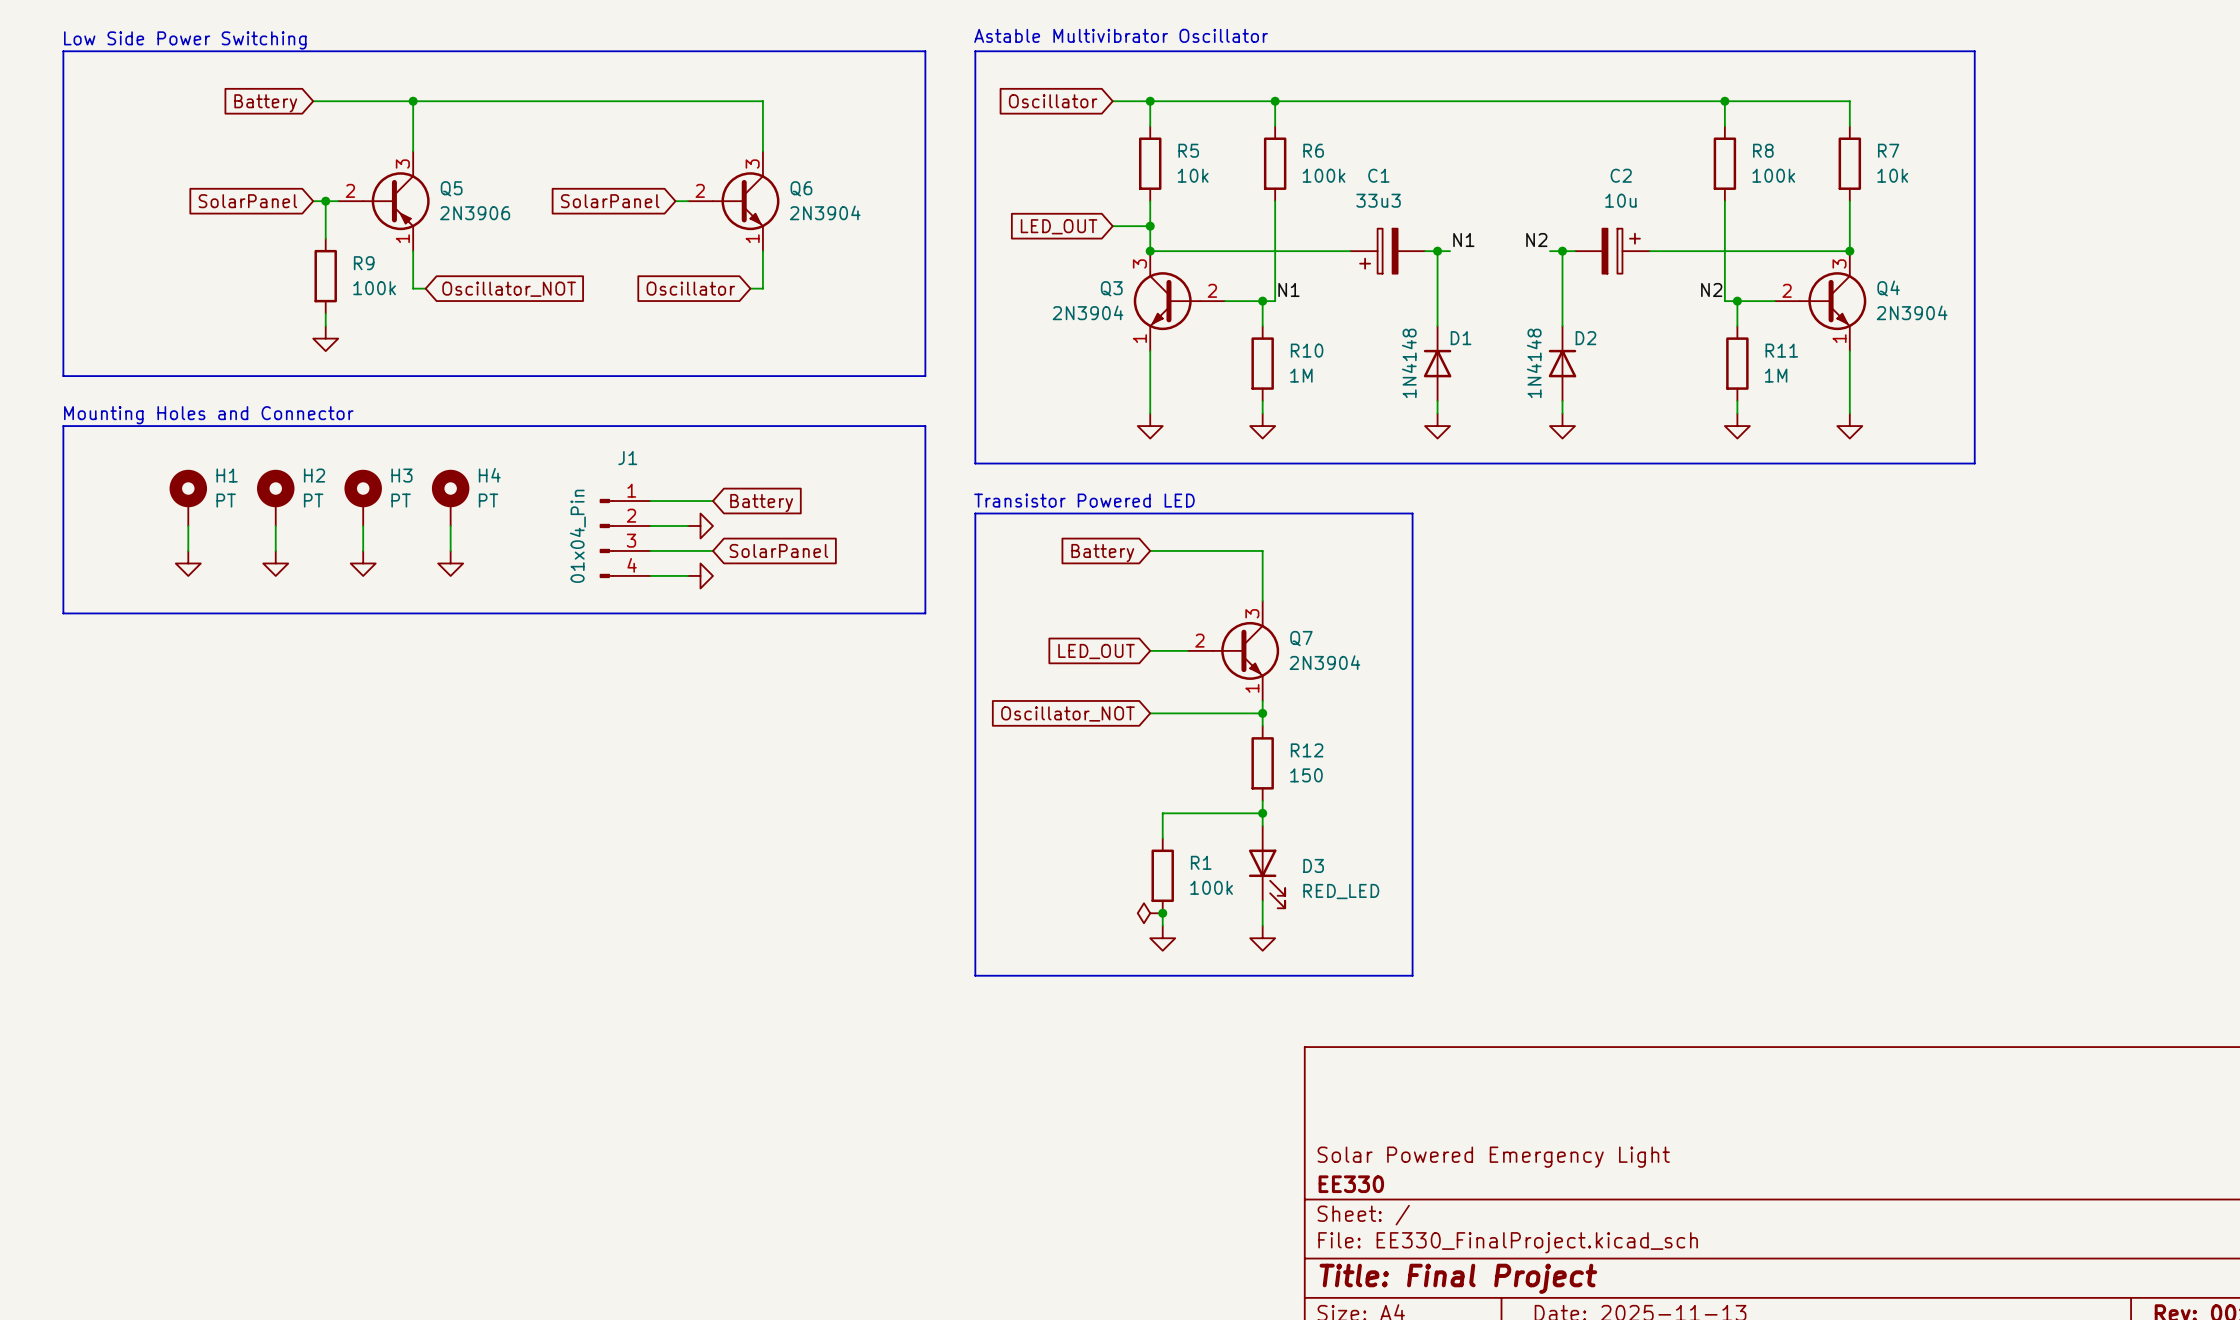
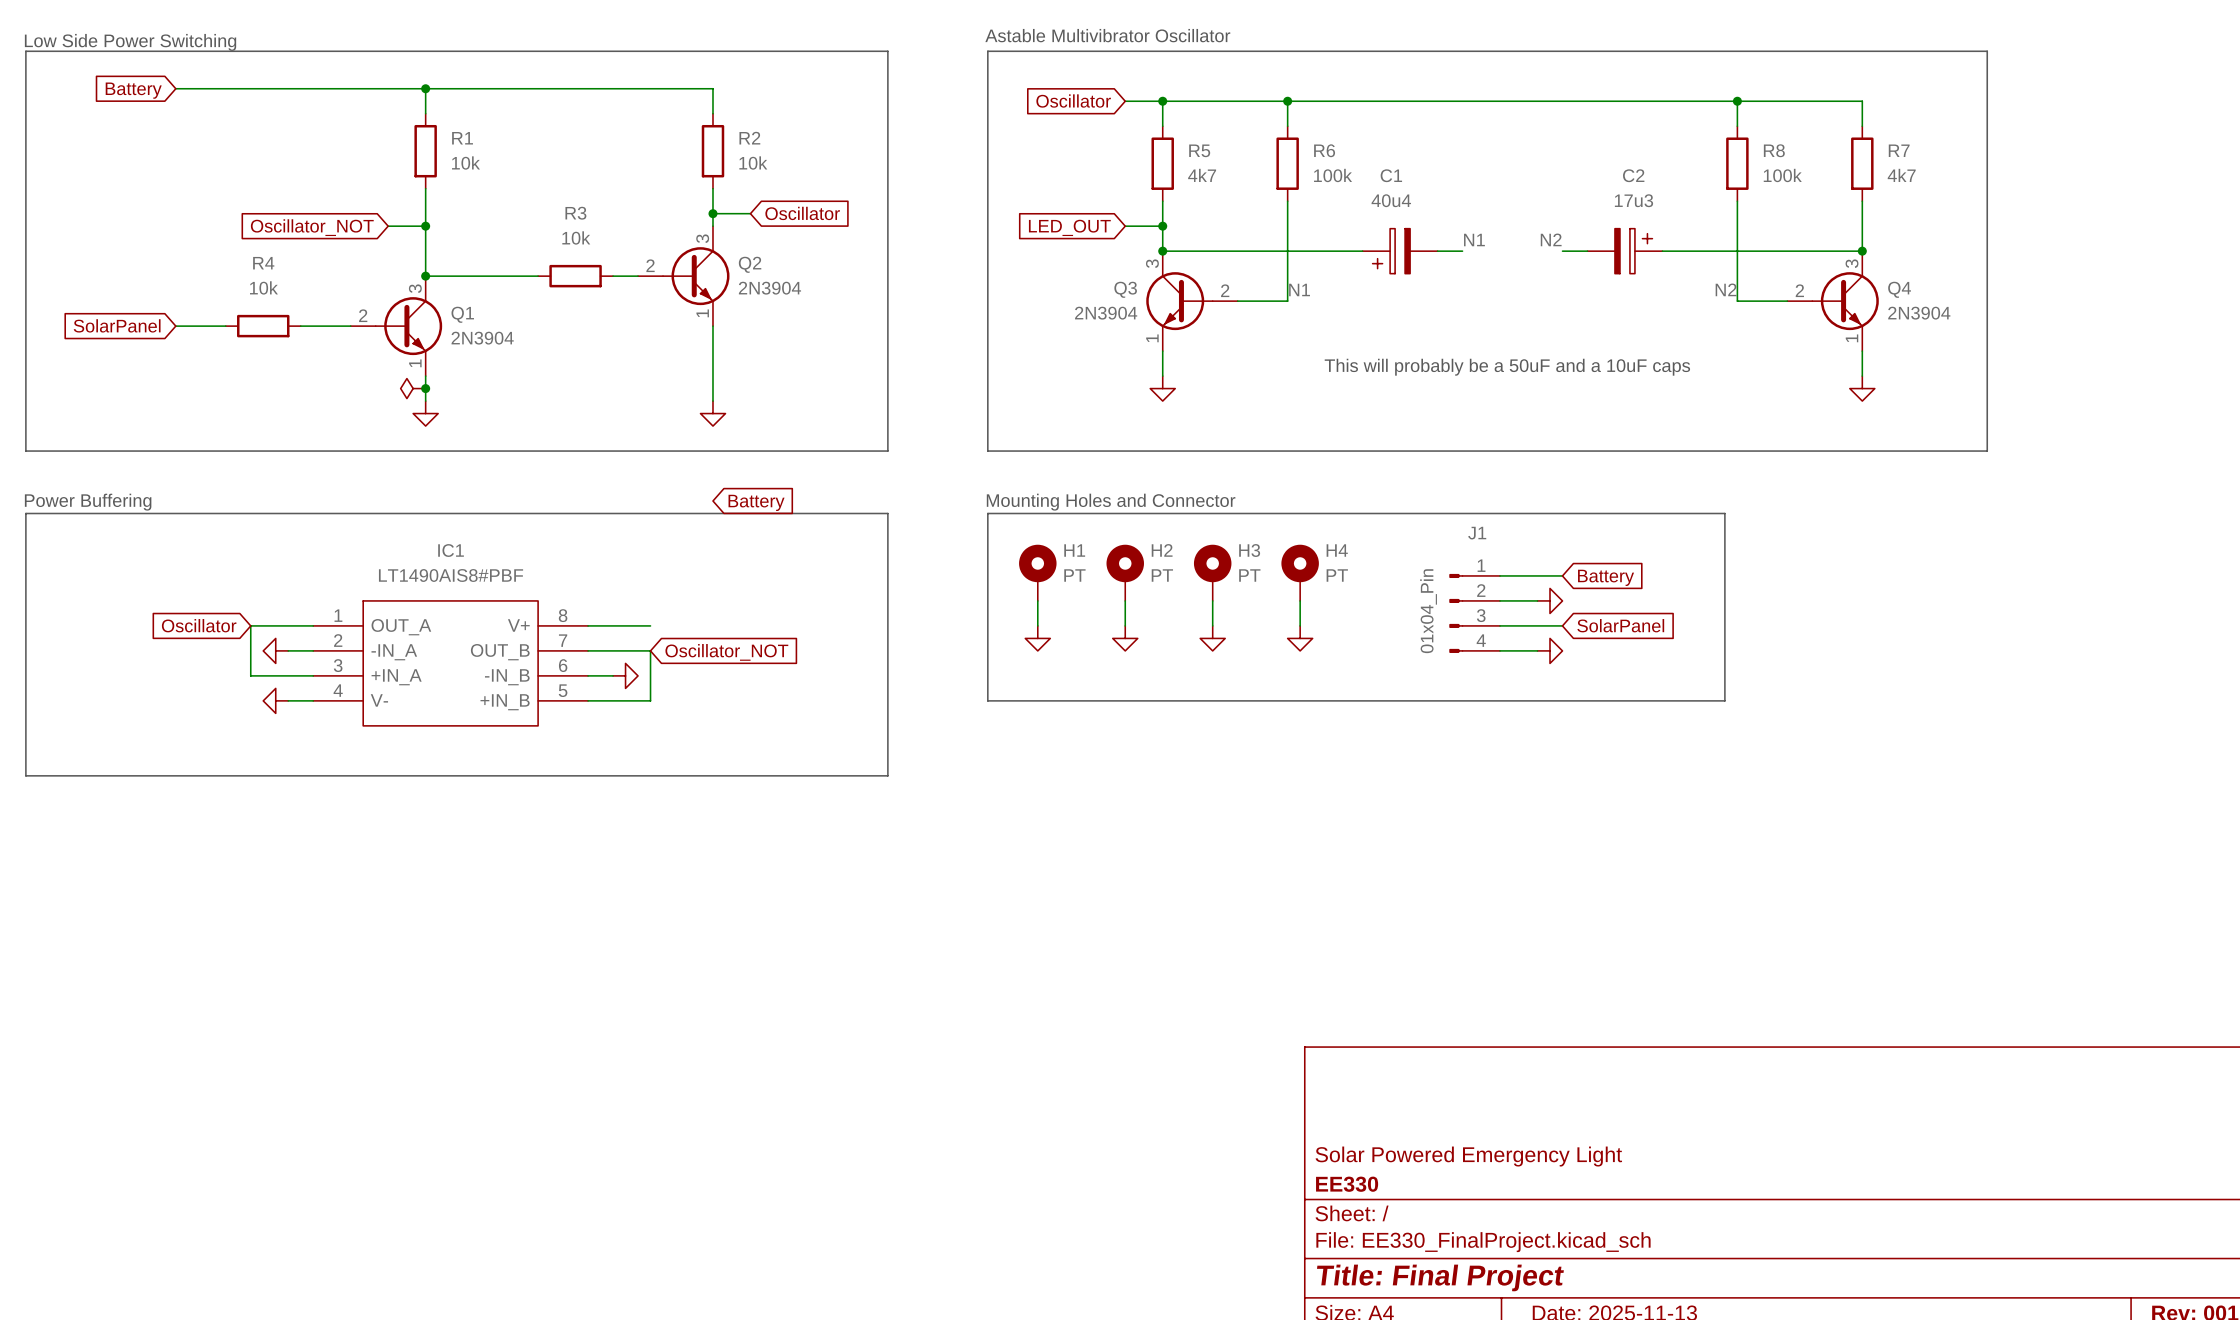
text position: Astable Multivibrator Oscillator (1121, 35) -> Astable Multivibrator Oscillator (1107, 35)
text position: Low Side Power Switching (185, 40) -> Low Side Power Switching (130, 42)
line: (63, 51) (63, 376) (925, 376) (925, 51) (887, 51) -> (63, 51) (25, 51) (25, 451) (887, 451) (887, 51)
line: (987, 51) (975, 51) (975, 463) (1974, 463) (1974, 51) -> (987, 51) (987, 451) (1987, 451) (1987, 51) (1974, 51)
wire: none -> (175, 88) (712, 88) (712, 113)
wire: none -> (425, 88) (425, 113)
wire: (313, 101) (762, 101) (762, 151) -> none
wire: (413, 101) (413, 151) -> none
junction position: (413, 101) -> (425, 88)
global label position: Oscillator (1053, 101) -> Oscillator (1073, 101)
wire: (1112, 101) (1125, 101) -> none
wire: (1150, 101) (1150, 126) -> (1162, 101) (1162, 126)
junction position: (1150, 101) -> (1162, 101)
wire: (1275, 101) (1275, 126) -> (1287, 101) (1287, 126)
junction position: (1275, 101) -> (1287, 101)
wire: (1724, 101) (1724, 126) -> (1737, 101) (1737, 126)
junction position: (1724, 101) -> (1737, 101)
wire: (1849, 101) (1849, 126) -> (1849, 101) (1862, 101) (1862, 126)
global label position: Battery (265, 103) -> Battery (133, 90)
R2: none -> 10k (712, 151)
R5 position: (1150, 163) -> (1162, 163)
R6 position: (1275, 163) -> (1287, 163)
R8 position: (1724, 163) -> (1737, 163)
R7 position: (1849, 163) -> (1862, 163)
R5 value: 10k (1193, 175) -> 4k7 (1202, 175)
R7 value: 10k (1892, 175) -> 4k7 (1901, 175)
wire: none -> (425, 188) (425, 276) (538, 276)
wire: none -> (712, 188) (712, 226)
C1 value: 33u3 (1378, 200) -> 40u4 (1391, 200)
C2 value: 10u (1620, 200) -> 17u3 (1633, 200)
global label position: SolarPanel (247, 201) -> SolarPanel (117, 325)
wire: (313, 201) (338, 201) -> none
wire: (325, 201) (325, 238) -> none
junction: (325, 201) -> none
Q5: 2N3906 (383, 201) -> none
global label: SolarPanel (610, 201) -> none
wire: (675, 201) (688, 201) -> none
Q6: 2N3904 (733, 201) -> none
wire: (1150, 201) (1150, 251) (1162, 251) -> (1162, 201) (1162, 251)
wire: (1275, 201) (1275, 301) -> (1287, 201) (1287, 301) (1275, 301)
wire: (1724, 201) (1724, 301) (1737, 301) (1737, 326) -> none
wire: none -> (1737, 201) (1737, 301)
wire: (1849, 201) (1849, 251) -> (1862, 201) (1862, 251) (1849, 251)
wire: none -> (712, 213) (750, 213)
junction: none -> (712, 213)
wire: none -> (388, 226) (425, 226)
junction: none -> (425, 226)
global label position: LED_OUT (1059, 226) -> LED_OUT (1069, 227)
wire: (1112, 226) (1125, 226) -> (1150, 226) (1162, 226)
junction position: (1150, 226) -> (1162, 226)
label position: N1 (1463, 240) -> N1 (1474, 240)
label position: N2 (1536, 240) -> N2 (1551, 239)
wire: (413, 251) (413, 288) (425, 288) -> none
wire: (762, 251) (762, 288) (750, 288) -> none
junction position: (1150, 251) -> (1162, 251)
C1 position: (1387, 251) -> (1400, 251)
wire: (1425, 251) (1437, 251) (1437, 326) -> none
junction: (1437, 251) -> none
wire: none -> (1450, 251) (1462, 251)
wire: (1550, 251) (1562, 251) (1562, 326) -> none
junction: (1562, 251) -> none
C2 position: (1612, 251) -> (1624, 251)
junction position: (1849, 251) -> (1862, 251)
R9: 100k (325, 276) -> none
junction: none -> (425, 276)
R3: none -> 10k (575, 276)
wire: none -> (613, 276) (638, 276)
Q2: none -> 2N3904 (683, 276)
global label rotation: 0° (690, 288) -> 180° (802, 213)
global label position: Oscillator (690, 288) -> Oscillator (802, 213)
global label rotation: 0° (509, 289) -> 180° (312, 227)
global label position: Oscillator_NOT (509, 289) -> Oscillator_NOT (312, 227)
label position: N1 (1288, 289) -> N1 (1299, 289)
label position: N2 (1711, 289) -> N2 (1726, 289)
Q3 position: (1179, 301) -> (1191, 301)
wire: (1262, 301) (1262, 326) -> (1162, 351) (1162, 376)
junction: (1262, 301) -> none
junction: (1737, 301) -> none
Q4 position: (1820, 301) -> (1833, 301)
wire: (325, 313) (325, 326) -> none
wire: none -> (175, 326) (225, 326)
R4: none -> 10k (263, 326)
wire: none -> (300, 326) (350, 326)
Q1: none -> 2N3904 (396, 326)
wire: none -> (712, 326) (712, 401)
power symbol: (325, 338) -> none
wire: (1150, 351) (1150, 413) -> none
wire: (1849, 351) (1849, 413) -> none
wire: none -> (1862, 351) (1862, 376)
R10: 1M (1262, 363) -> none
D1: 1N4148 (1437, 363) -> none
D2: 1N4148 (1562, 363) -> none
R11: 1M (1737, 363) -> none
text: none -> This will probably be a 50uF and a 10uF caps (1507, 367)
power symbol: none -> (413, 388)
junction: none -> (425, 388)
wire: (1262, 401) (1262, 413) -> none
wire: (1437, 401) (1437, 413) -> none
wire: (1562, 401) (1562, 413) -> none
wire: (1737, 401) (1737, 413) -> none
power symbol: none -> (425, 413)
power symbol: none -> (712, 413)
text: Mounting Holes and Connector (208, 415) -> none
line: (63, 426) (63, 613) (925, 613) (925, 426) (63, 426) -> none
power symbol position: (1150, 426) -> (1162, 388)
power symbol: (1262, 426) -> none
power symbol: (1437, 426) -> none
power symbol: (1562, 426) -> none
power symbol: (1737, 426) -> none
power symbol position: (1849, 426) -> (1862, 388)
H1 position: (188, 497) -> (1037, 572)
H2 position: (275, 497) -> (1125, 572)
H3 position: (363, 497) -> (1212, 572)
H4 position: (450, 497) -> (1300, 572)
text: Transistor Powered LED (1084, 500) -> none
wire: (650, 501) (712, 501) -> none
text: none -> Power Buffering (88, 502)
text: none -> Mounting Holes and Connector (1111, 502)
line: none -> (25, 513) (887, 513) (887, 775) (25, 775) (25, 513)
line: (987, 513) (975, 513) (975, 975) (1412, 975) (1412, 513) -> (987, 513) (987, 700) (1724, 700) (1724, 513) (1412, 513)
wire: (188, 526) (188, 550) -> none
wire: (275, 526) (275, 550) -> none
wire: (363, 526) (363, 550) -> none
wire: (450, 526) (450, 550) -> (425, 376) (425, 401)
wire: (650, 526) (688, 526) -> none
power symbol: (700, 526) -> none
J1 position: (625, 538) -> (1474, 613)
wire: (650, 550) (712, 550) -> (588, 625) (650, 625)
global label: SolarPanel (778, 550) -> none
wire: (1150, 550) (1262, 550) (1262, 600) -> none
global label: Battery (1102, 553) -> none
power symbol: (188, 563) -> none
power symbol: (275, 563) -> none
power symbol: (363, 563) -> none
power symbol: (450, 563) -> none
wire: (650, 575) (688, 575) -> none
power symbol: (700, 575) -> none
wire: none -> (1500, 575) (1562, 575)
global label: none -> Battery (1606, 577)
wire: none -> (1037, 600) (1037, 625)
wire: none -> (1125, 600) (1125, 625)
wire: none -> (1500, 600) (1537, 600)
power symbol: none -> (1550, 600)
global label: none -> Oscillator (199, 625)
wire: none -> (313, 625) (250, 625) (250, 675) (313, 675)
wire: none -> (1500, 625) (1562, 625)
global label: none -> SolarPanel (1620, 625)
power symbol: none -> (1037, 638)
power symbol: none -> (1125, 638)
power symbol: none -> (1212, 638)
power symbol: none -> (1300, 638)
power symbol: none -> (275, 650)
wire: none -> (288, 650) (313, 650)
wire: none -> (588, 650) (650, 650) (650, 700) (588, 700)
wire: (1150, 650) (1187, 650) -> none
Q7: 2N3904 (1233, 650) -> none
wire: none -> (1500, 650) (1537, 650)
power symbol: none -> (1550, 650)
global label: none -> Oscillator_NOT (726, 652)
global label: LED_OUT (1096, 651) -> none
IC1: none -> LT1490AIS8#PBF (450, 663)
wire: none -> (588, 675) (613, 675)
power symbol: none -> (625, 675)
power symbol: none -> (275, 700)
wire: none -> (288, 700) (313, 700)
wire: (1262, 700) (1262, 725) -> (1300, 600) (1300, 625)
global label: Oscillator_NOT (1067, 713) -> none
wire: (1150, 713) (1262, 713) -> none
junction: (1262, 713) -> none
R12: 150 (1262, 763) -> none
wire: (1262, 800) (1262, 825) -> (1212, 600) (1212, 625)
wire: (1262, 813) (1162, 813) (1162, 838) -> none
junction: (1262, 813) -> none
D3: RED_LED (1267, 867) -> none
R1 position: (1162, 875) -> (425, 151)
R1 value: 100k (1211, 887) -> 10k (465, 163)
wire: (1262, 900) (1262, 925) -> none
power symbol: (1150, 913) -> none
wire: (1162, 913) (1162, 925) -> none
junction: (1162, 913) -> none
power symbol: (1162, 938) -> none
power symbol: (1262, 938) -> none

